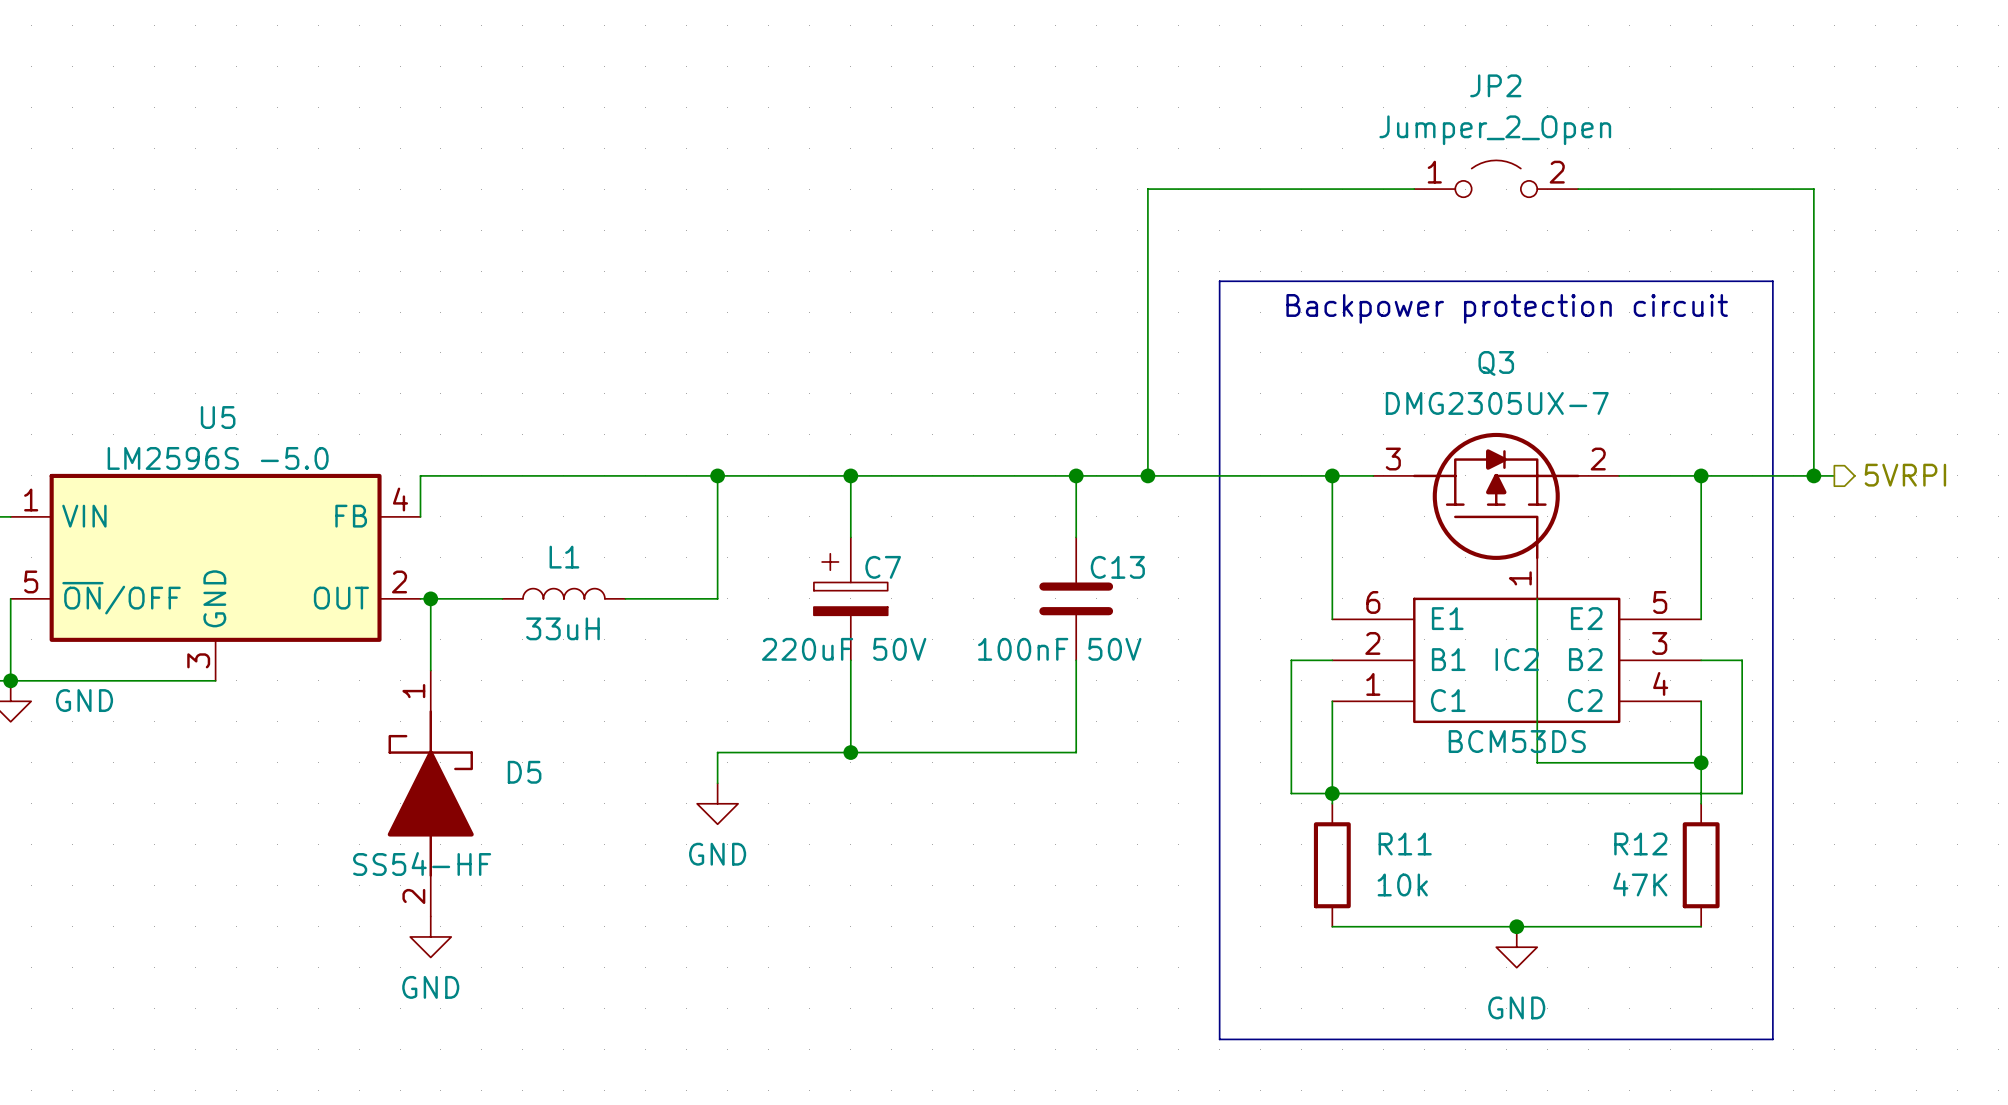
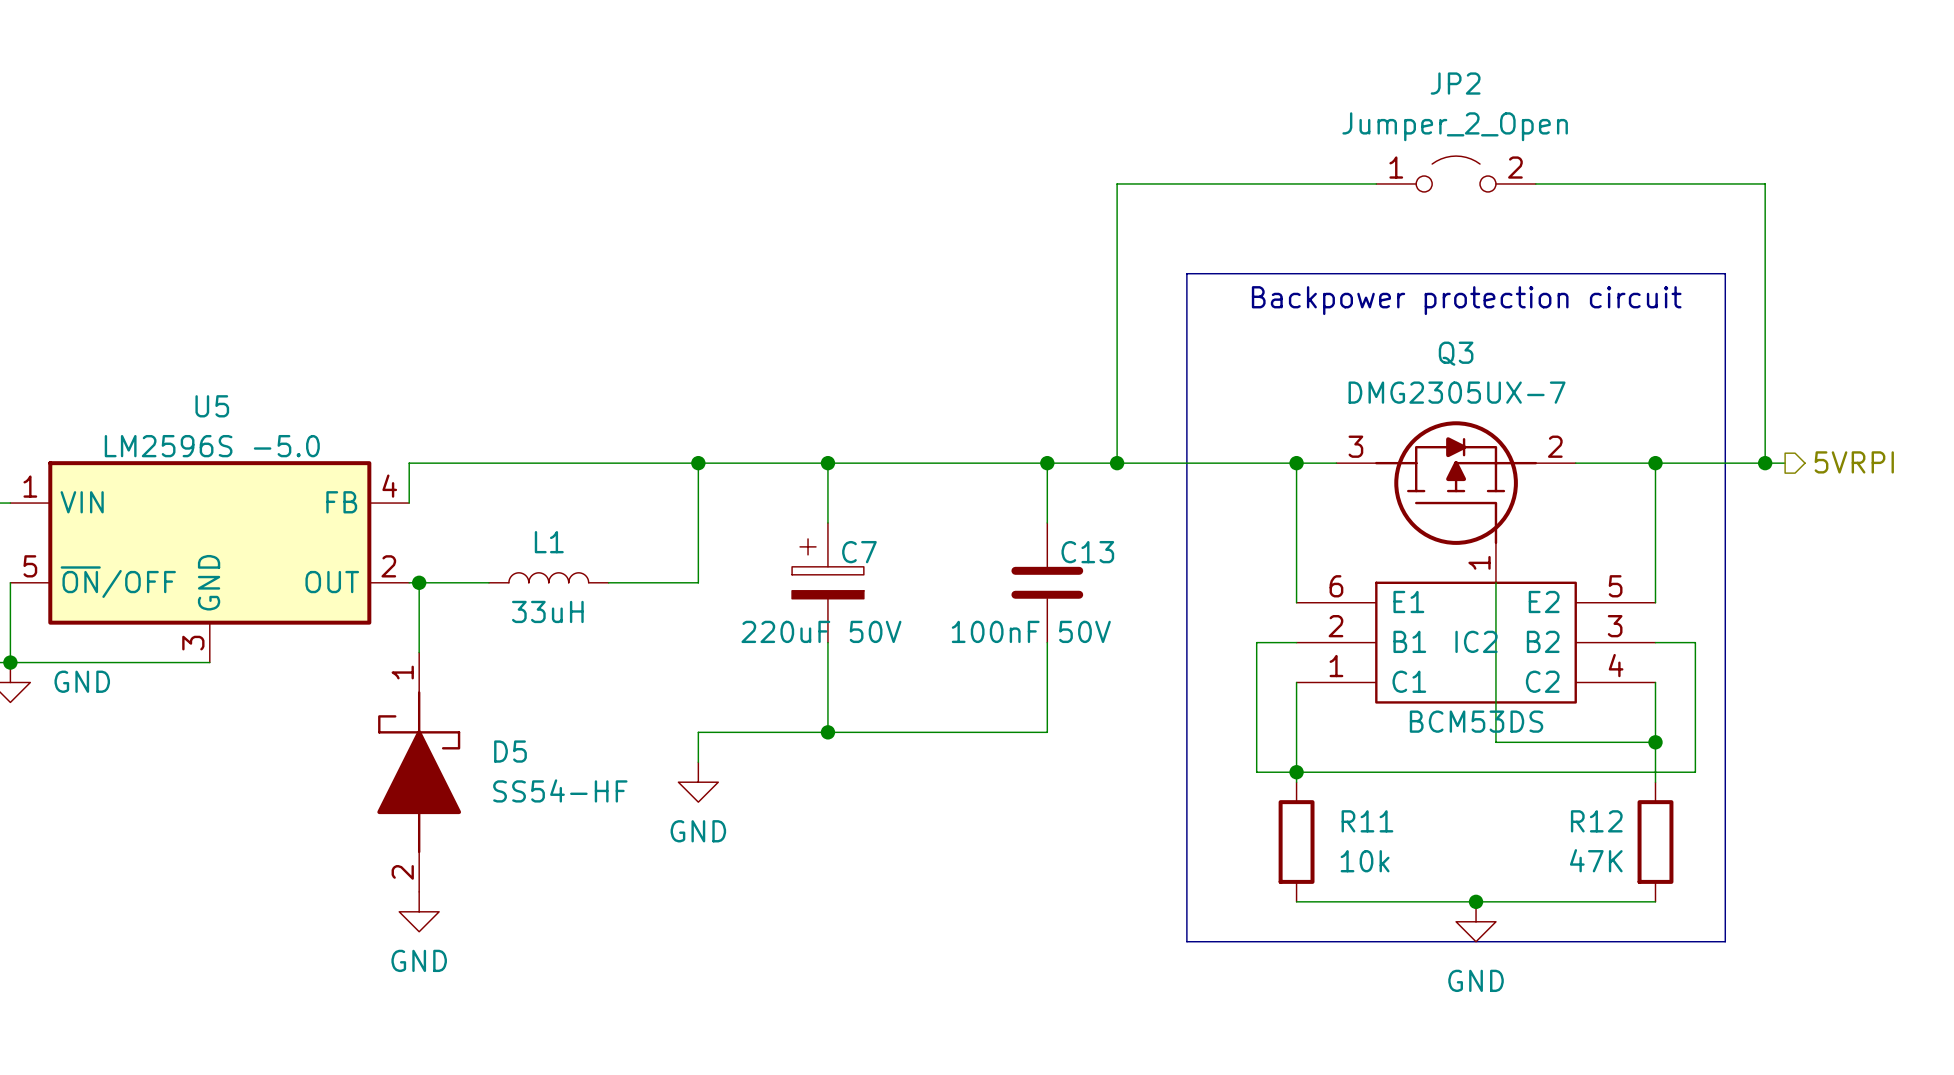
D5 value position: SS54-HF (422, 864) -> SS54-HF (560, 790)
line: (1219, 967) (1219, 1039) (1772, 1039) (1772, 967) -> (1186, 941) (1725, 941)

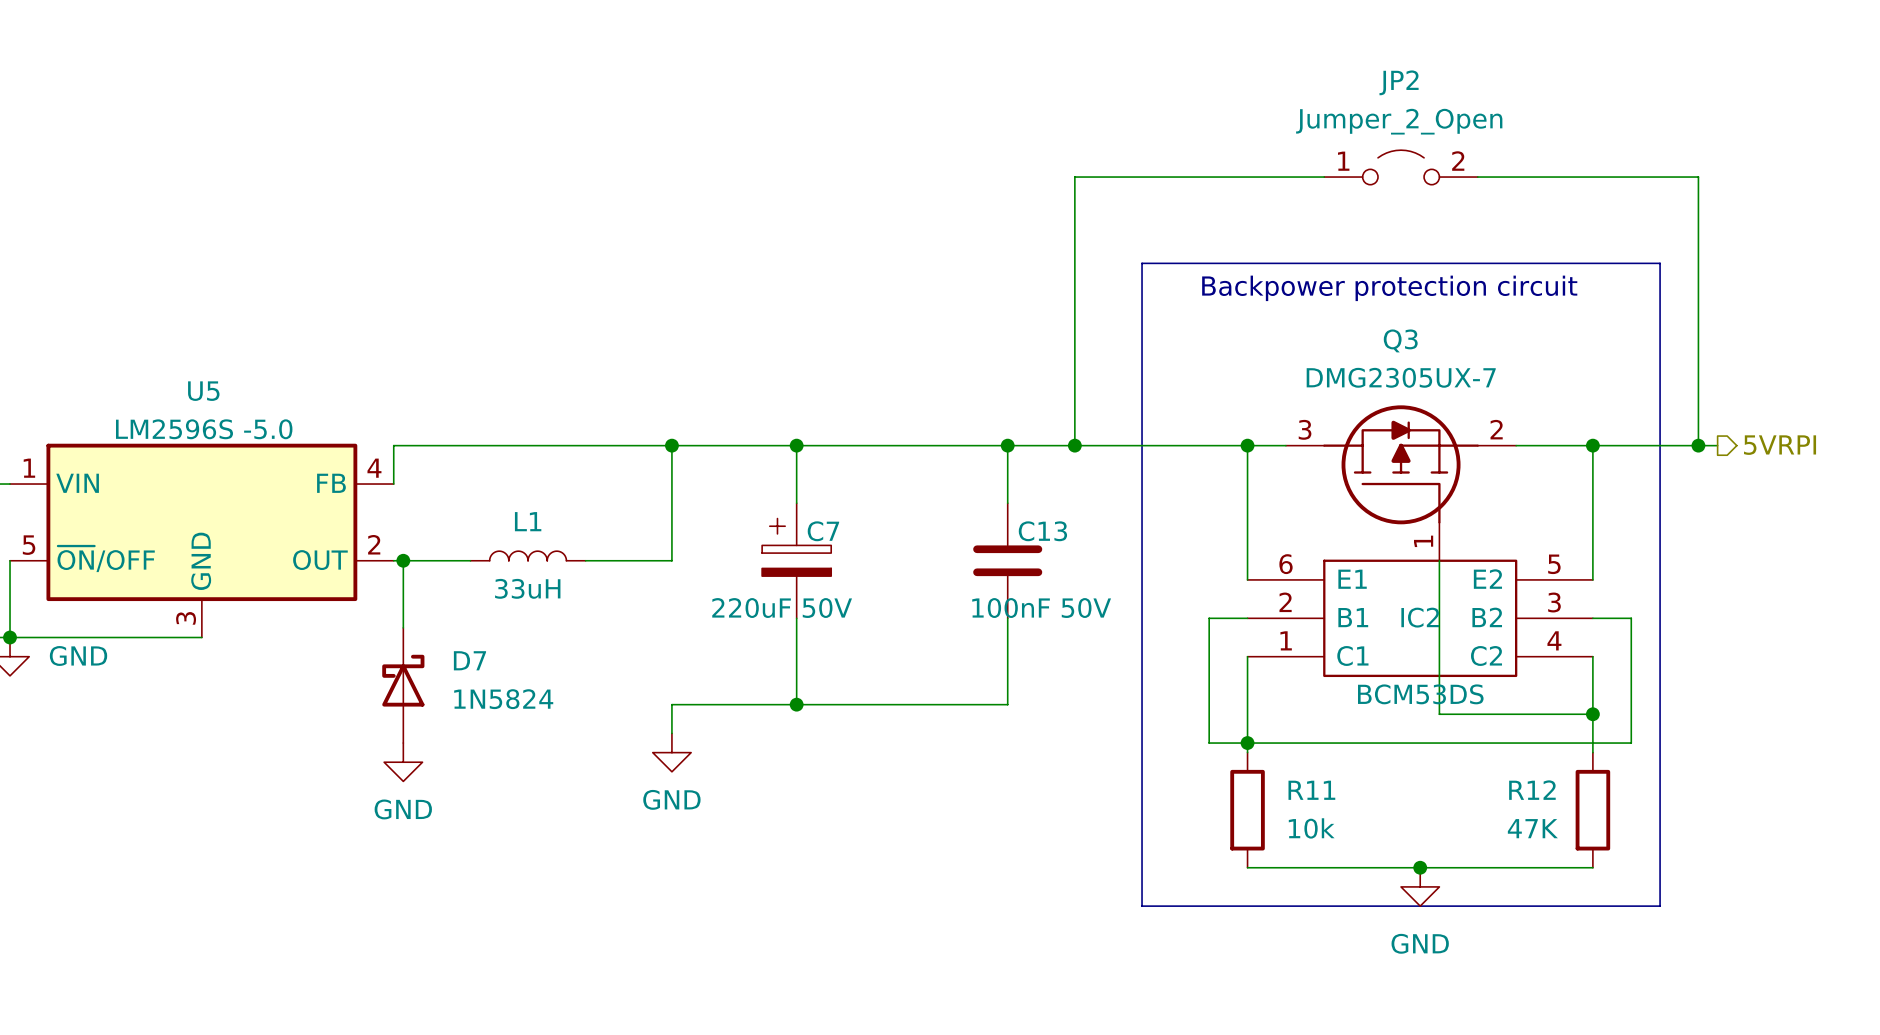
C13 value position: 100nF 50V (1031, 631) -> 100nF 50V (1041, 608)
D7: none -> 1N5824 (403, 685)
D5: SS54-HF (419, 772) -> none
power symbol position: GND (419, 911) -> GND (403, 762)

